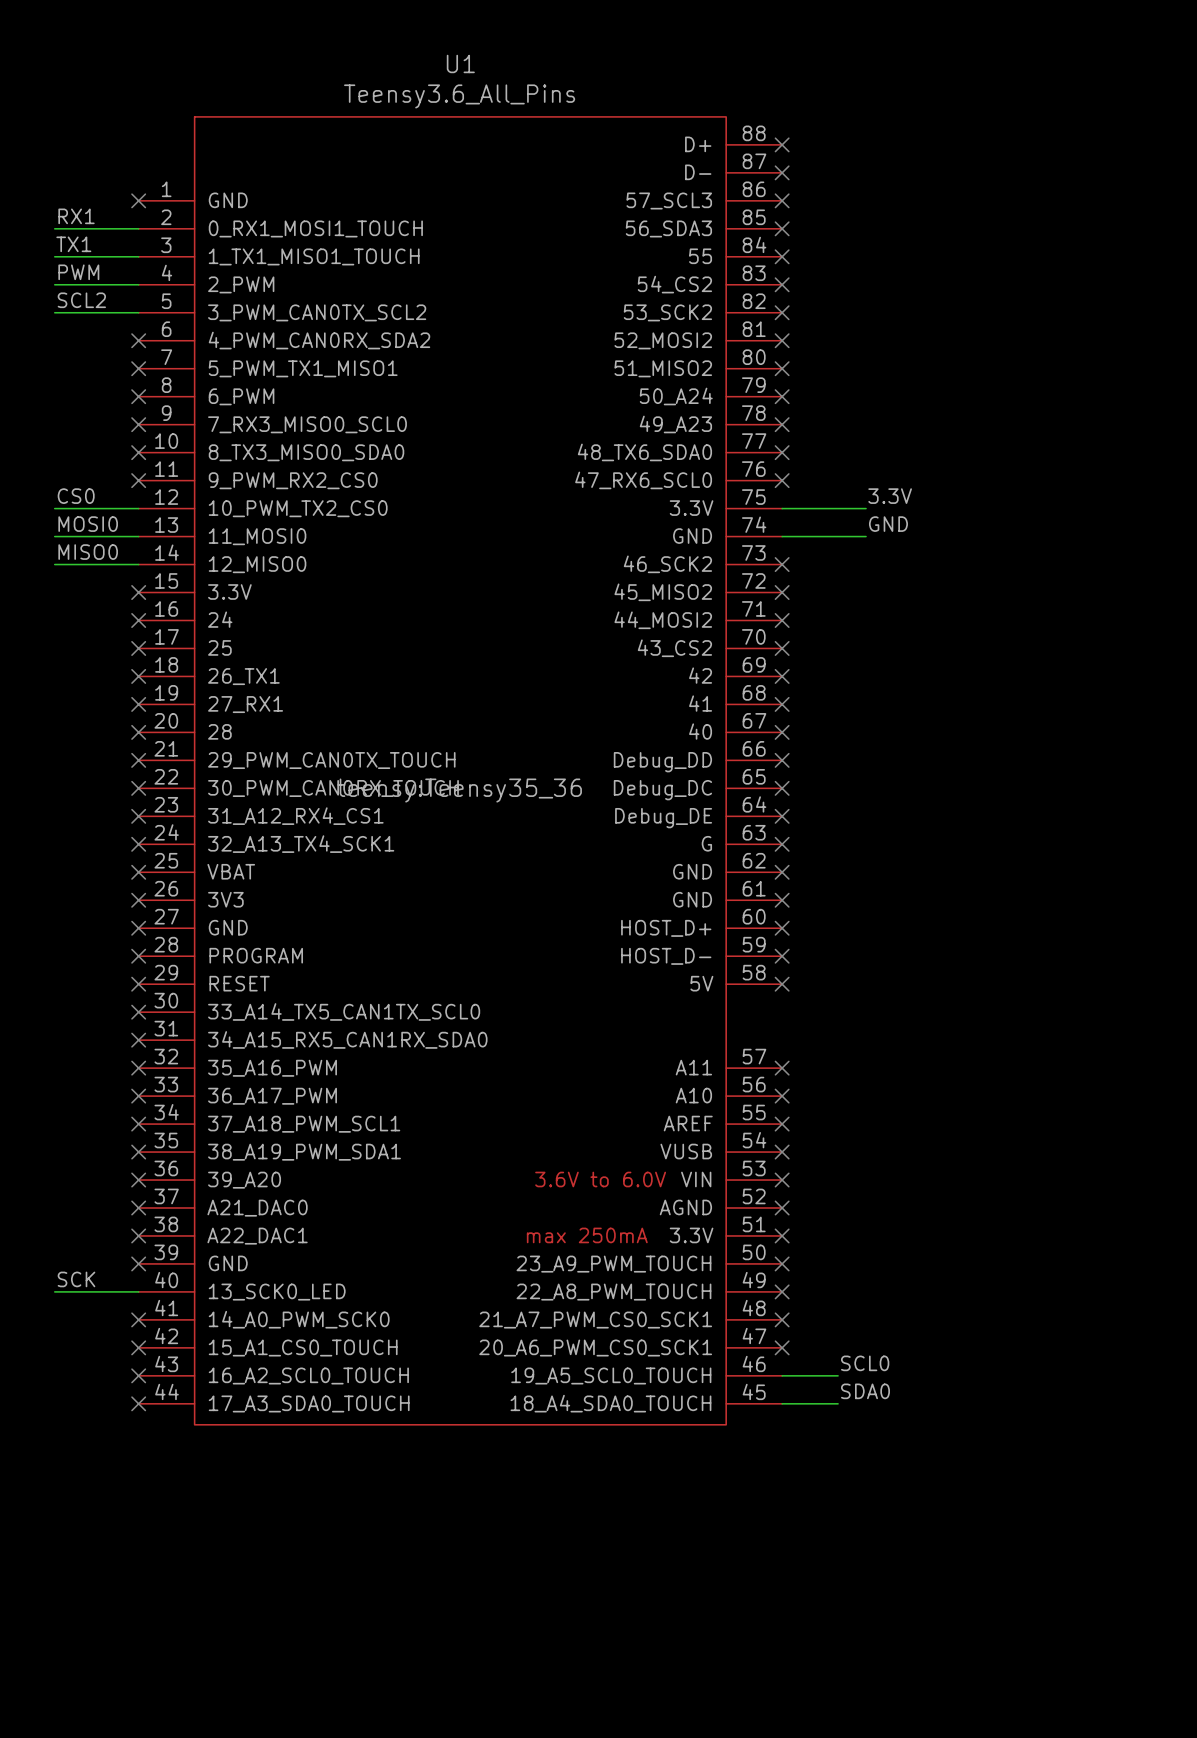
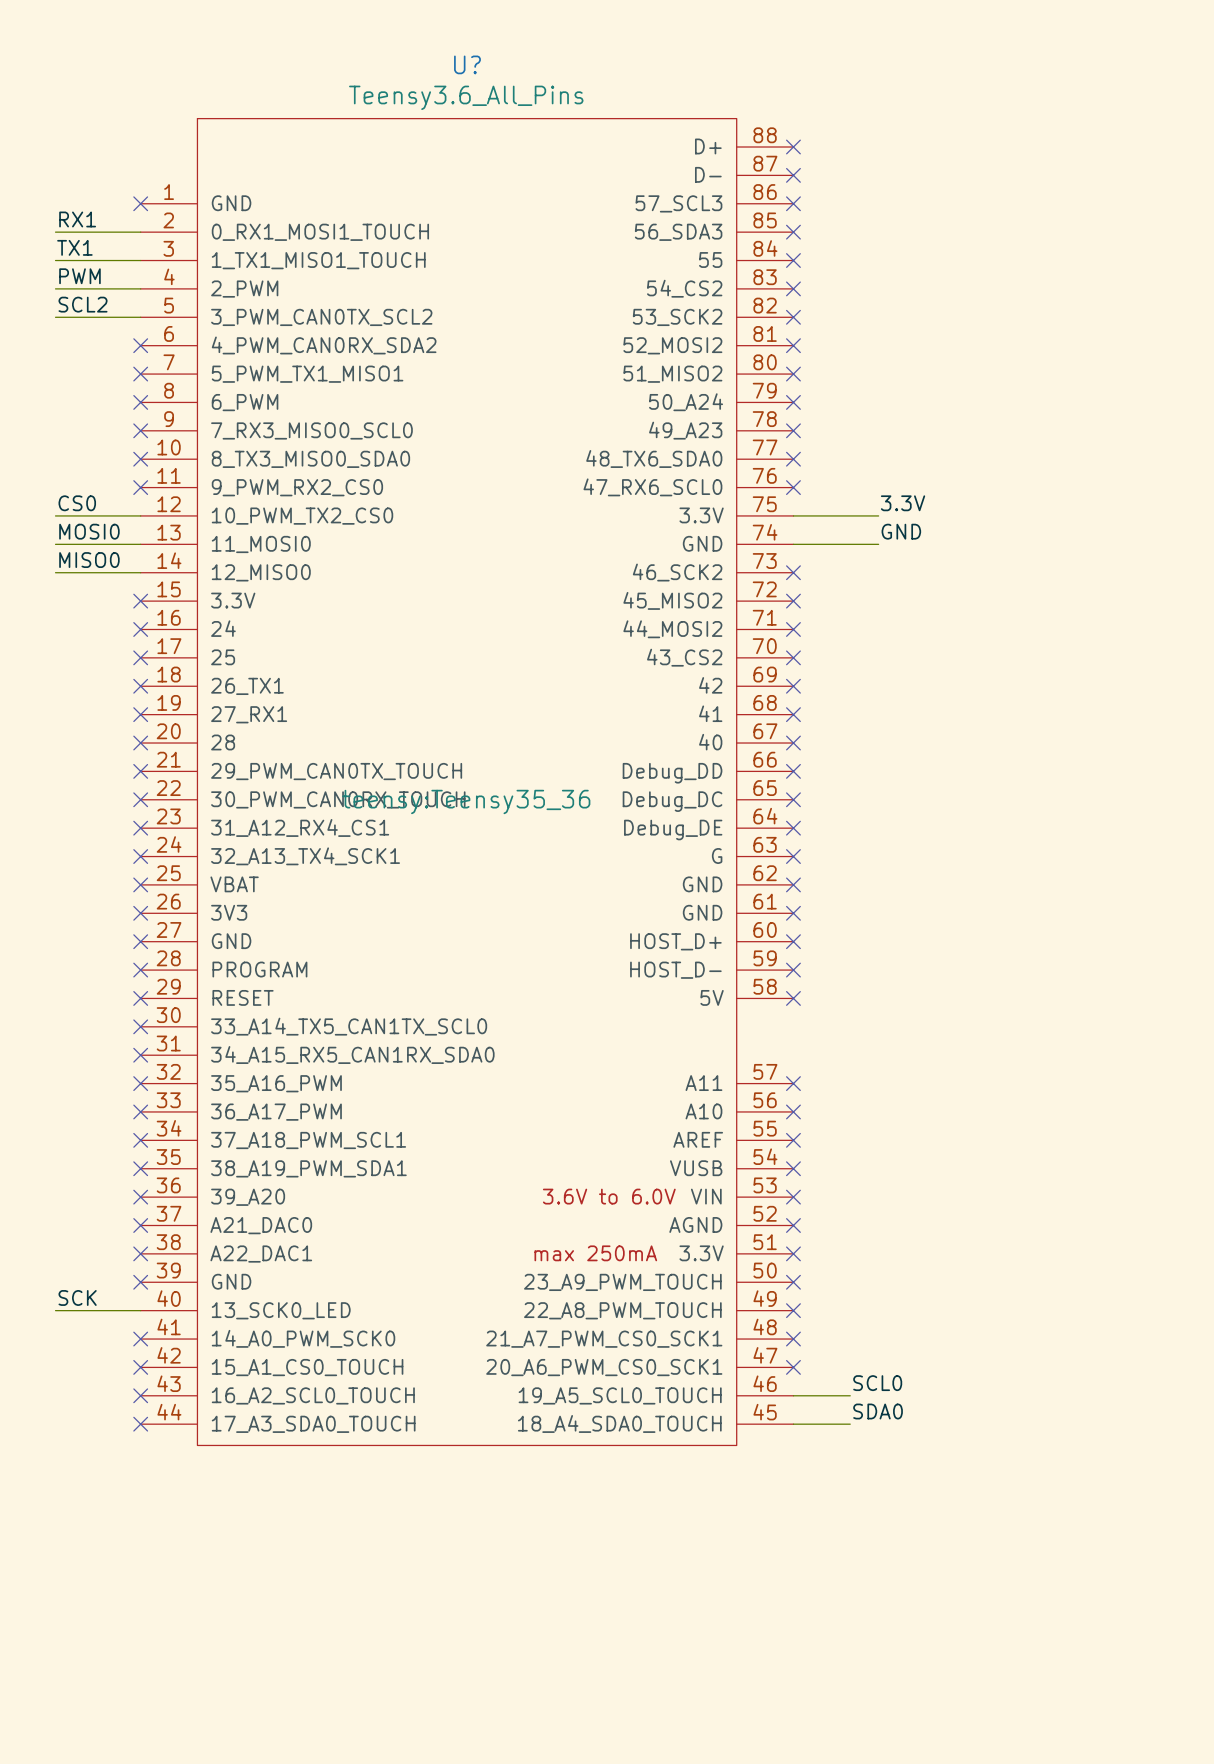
U1 name: U1 (460, 63) -> U? (467, 64)

